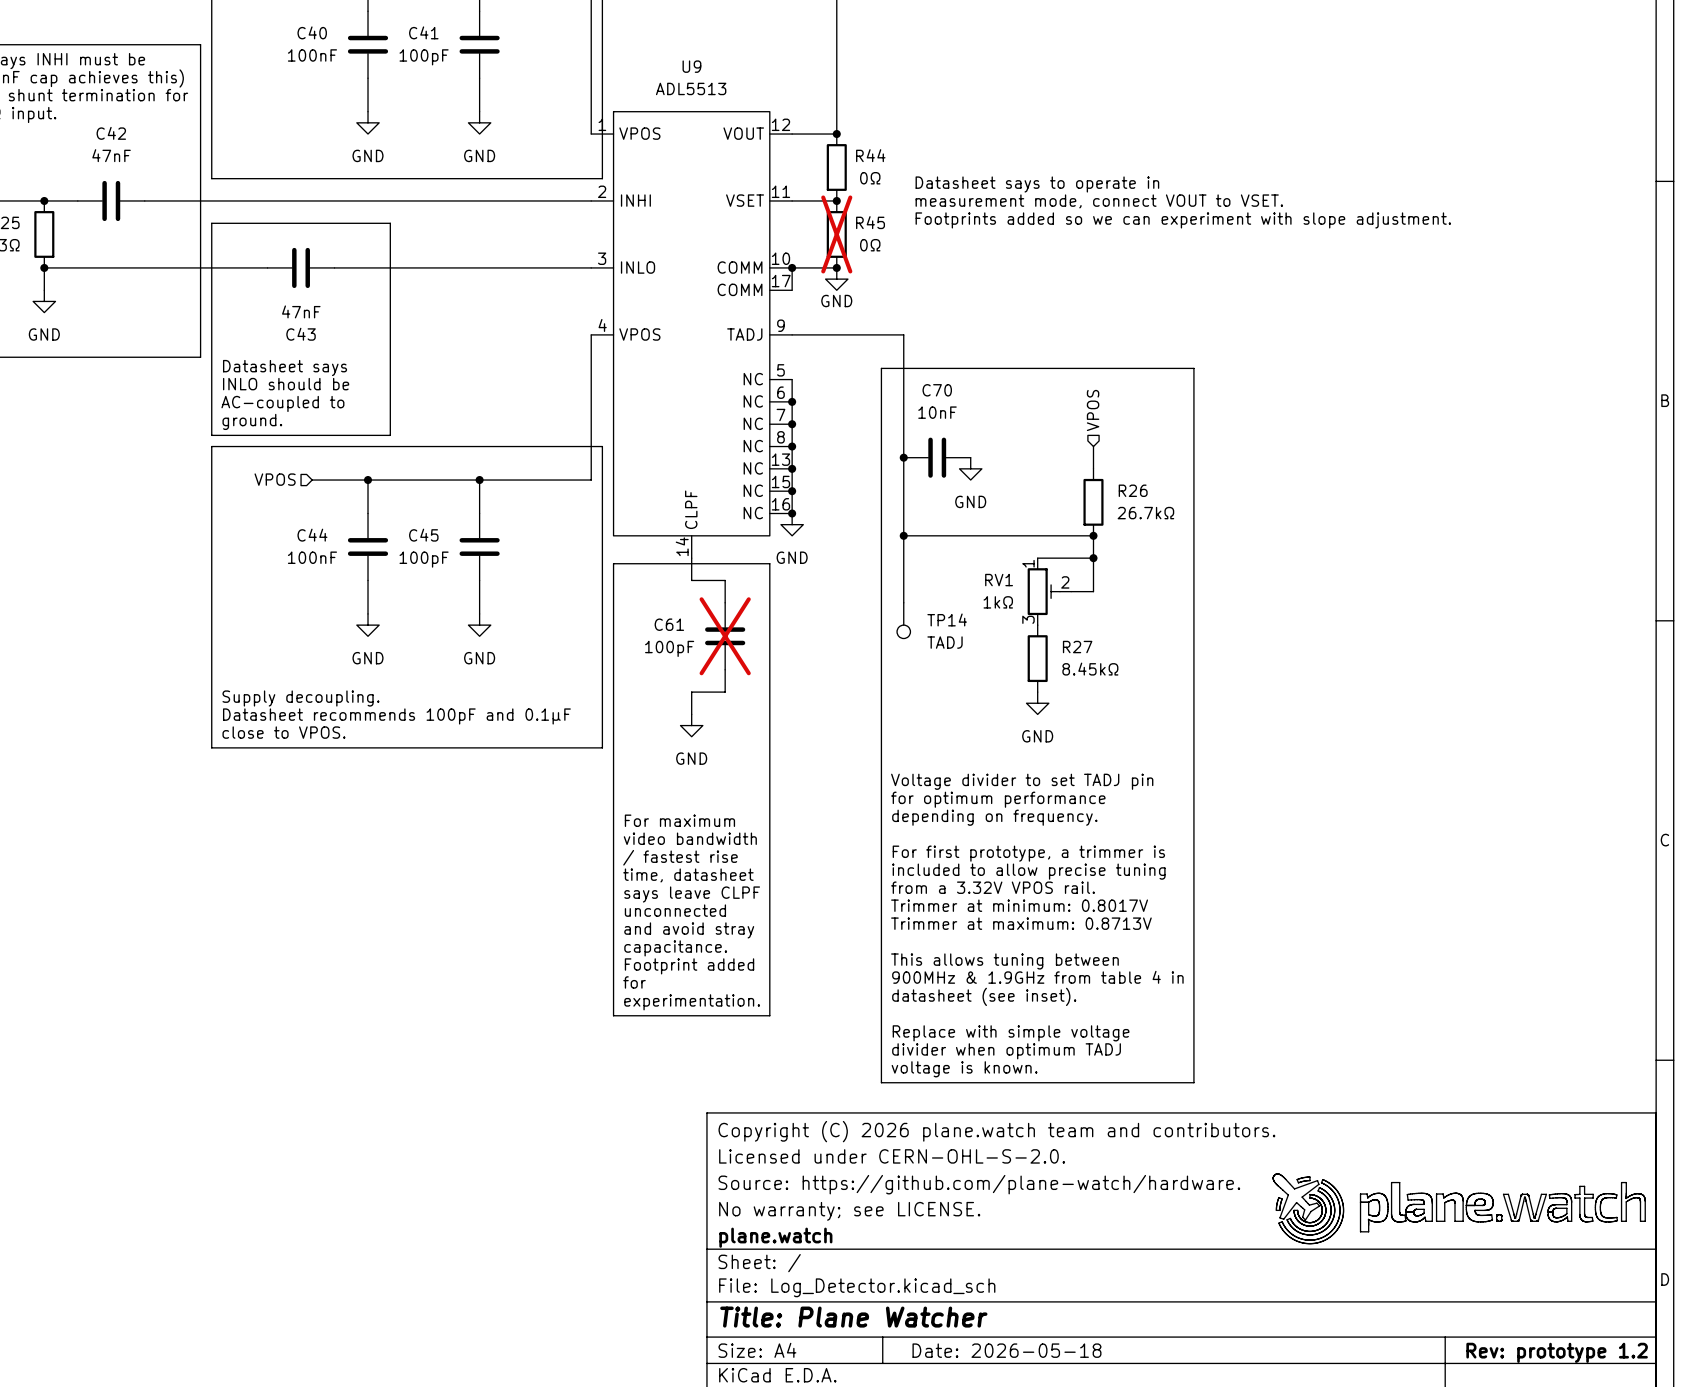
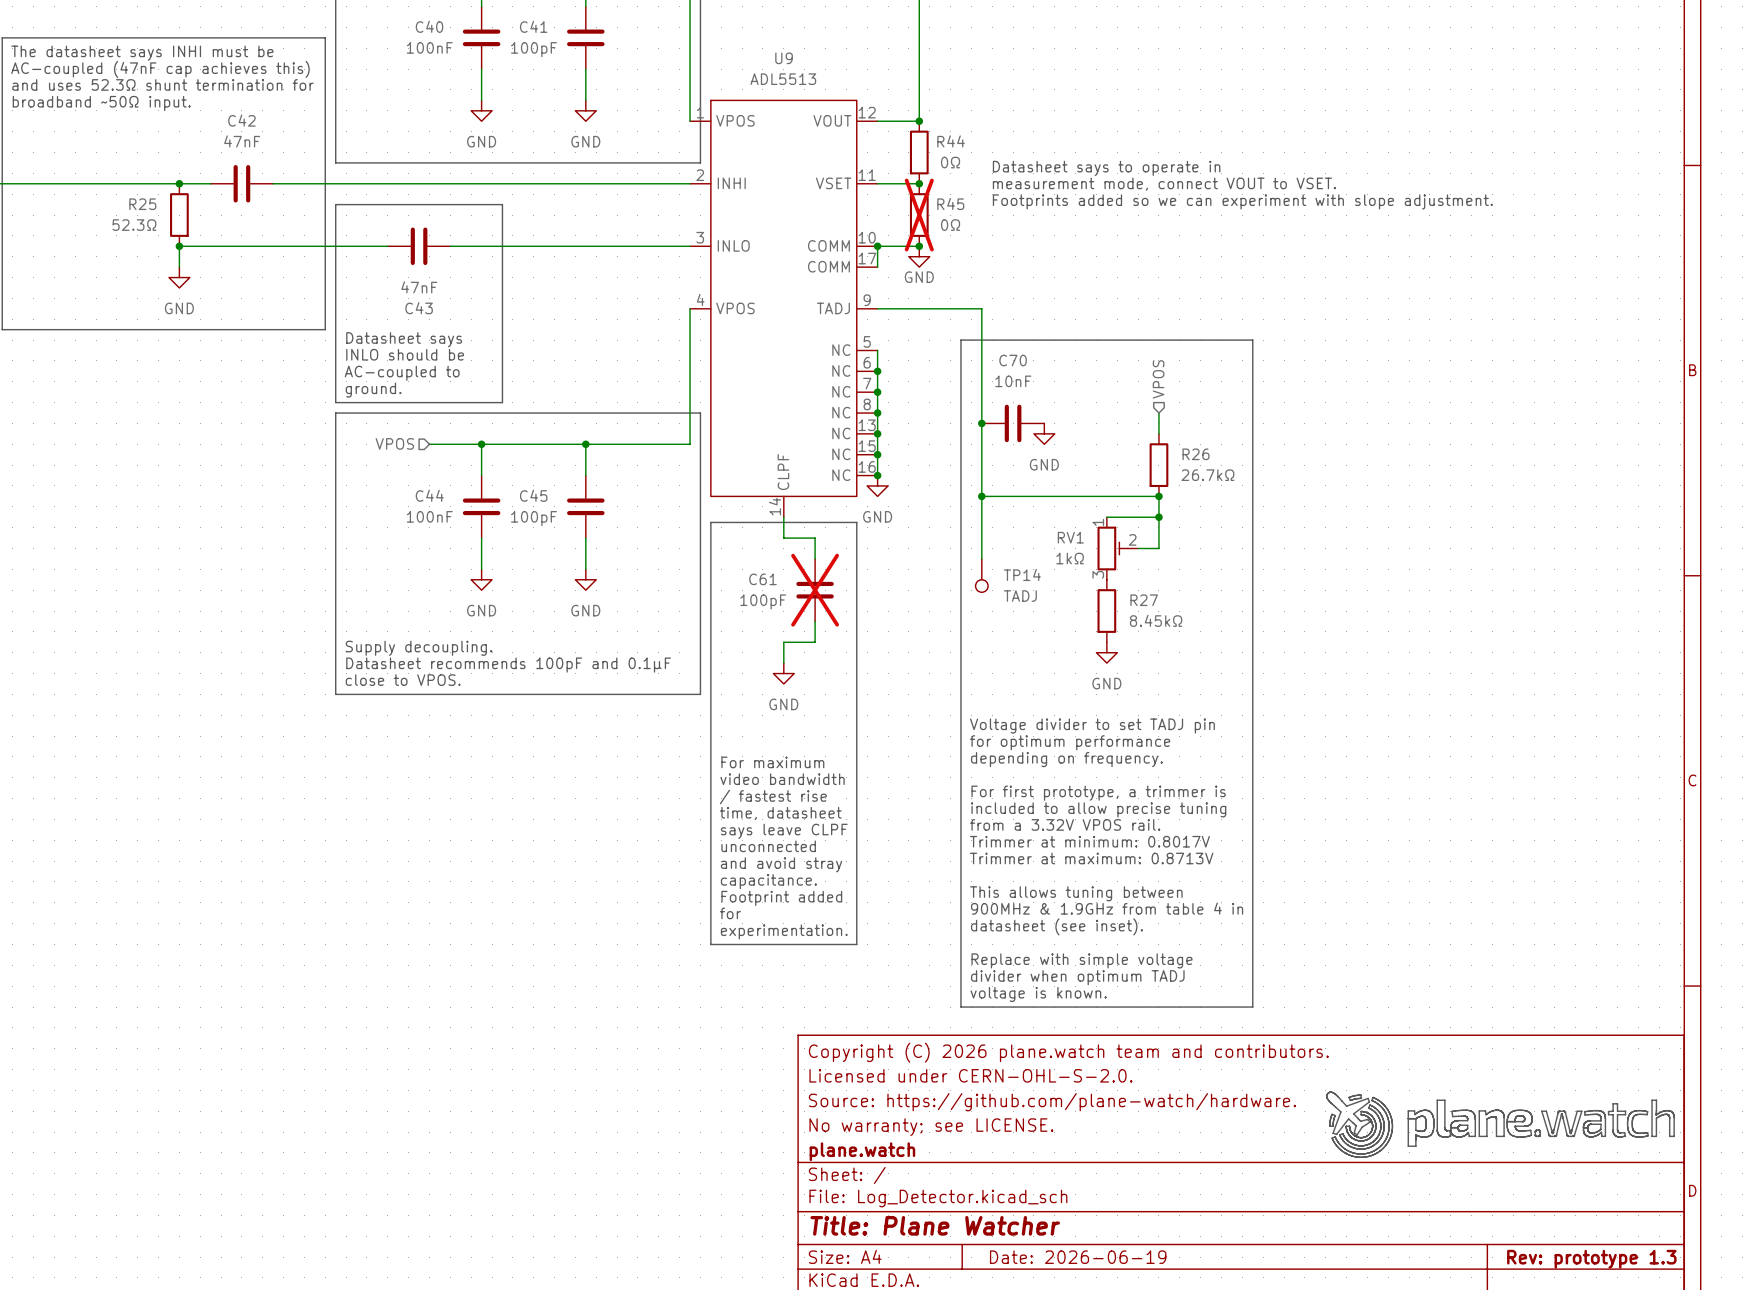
title block: Date: 2026-05-18 (1006, 1350) -> Date: 2026-06-19 (1078, 1257)
title block: Rev: prototype 1.2 (1557, 1352) -> Rev: prototype 1.3 (1591, 1259)

